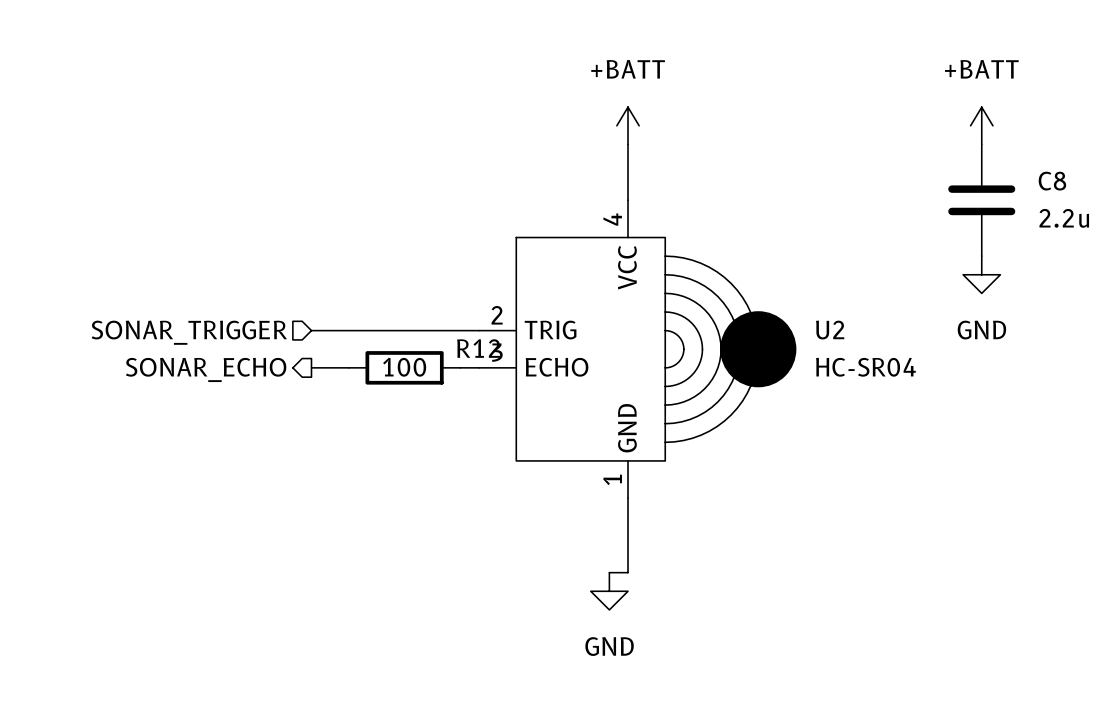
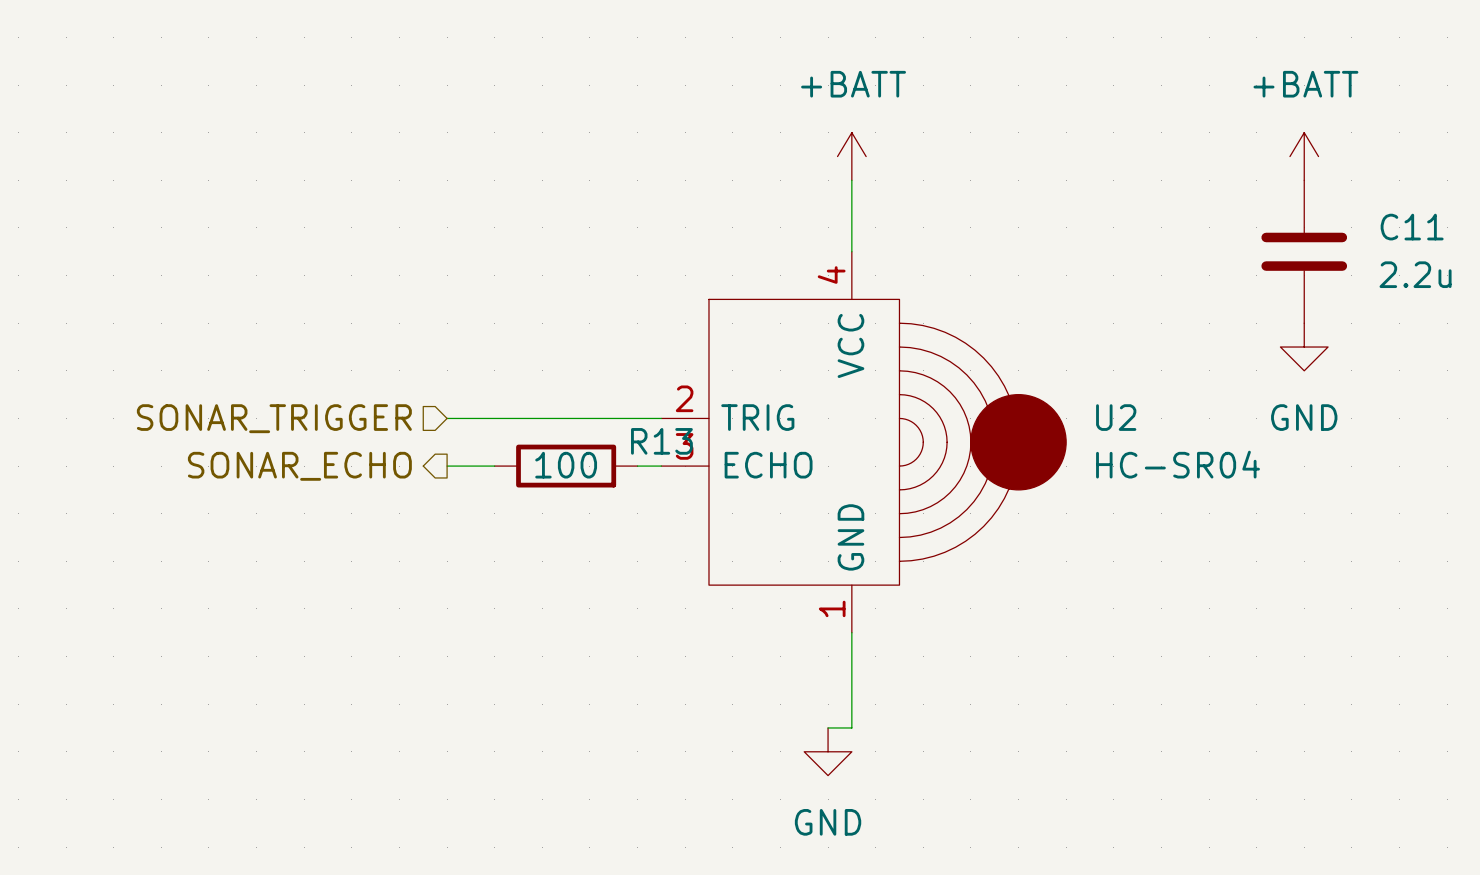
C8 name: C8 (1052, 181) -> C11 (1412, 227)
R12 name: R12 (478, 348) -> R13 (661, 441)

